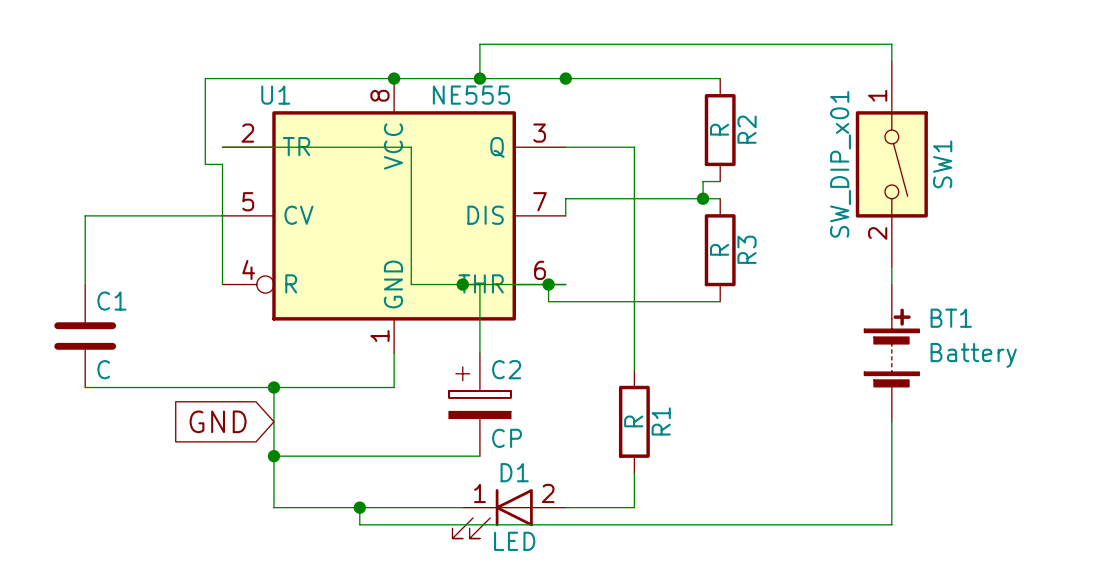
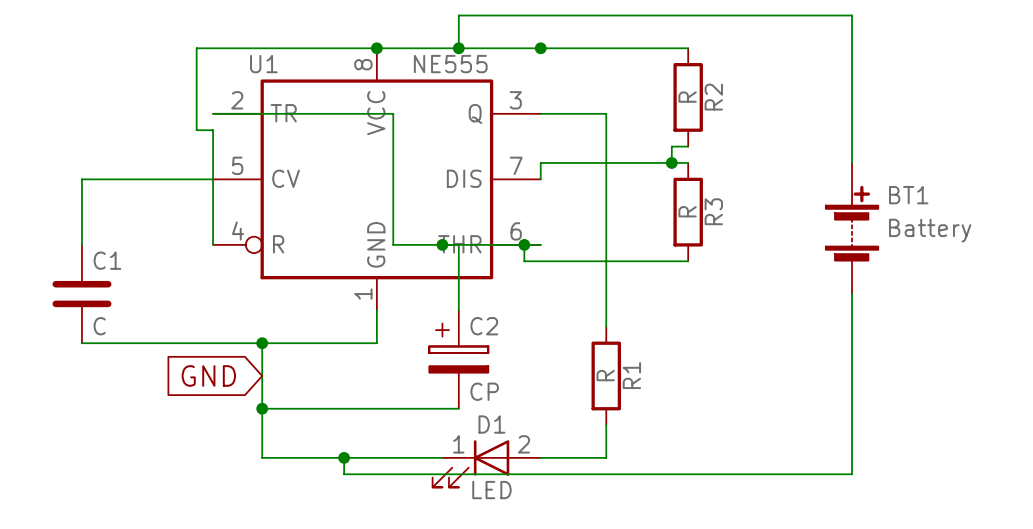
SW1: SW_DIP_x01 (891, 164) -> none
BT1 position: (891, 353) -> (852, 228)

